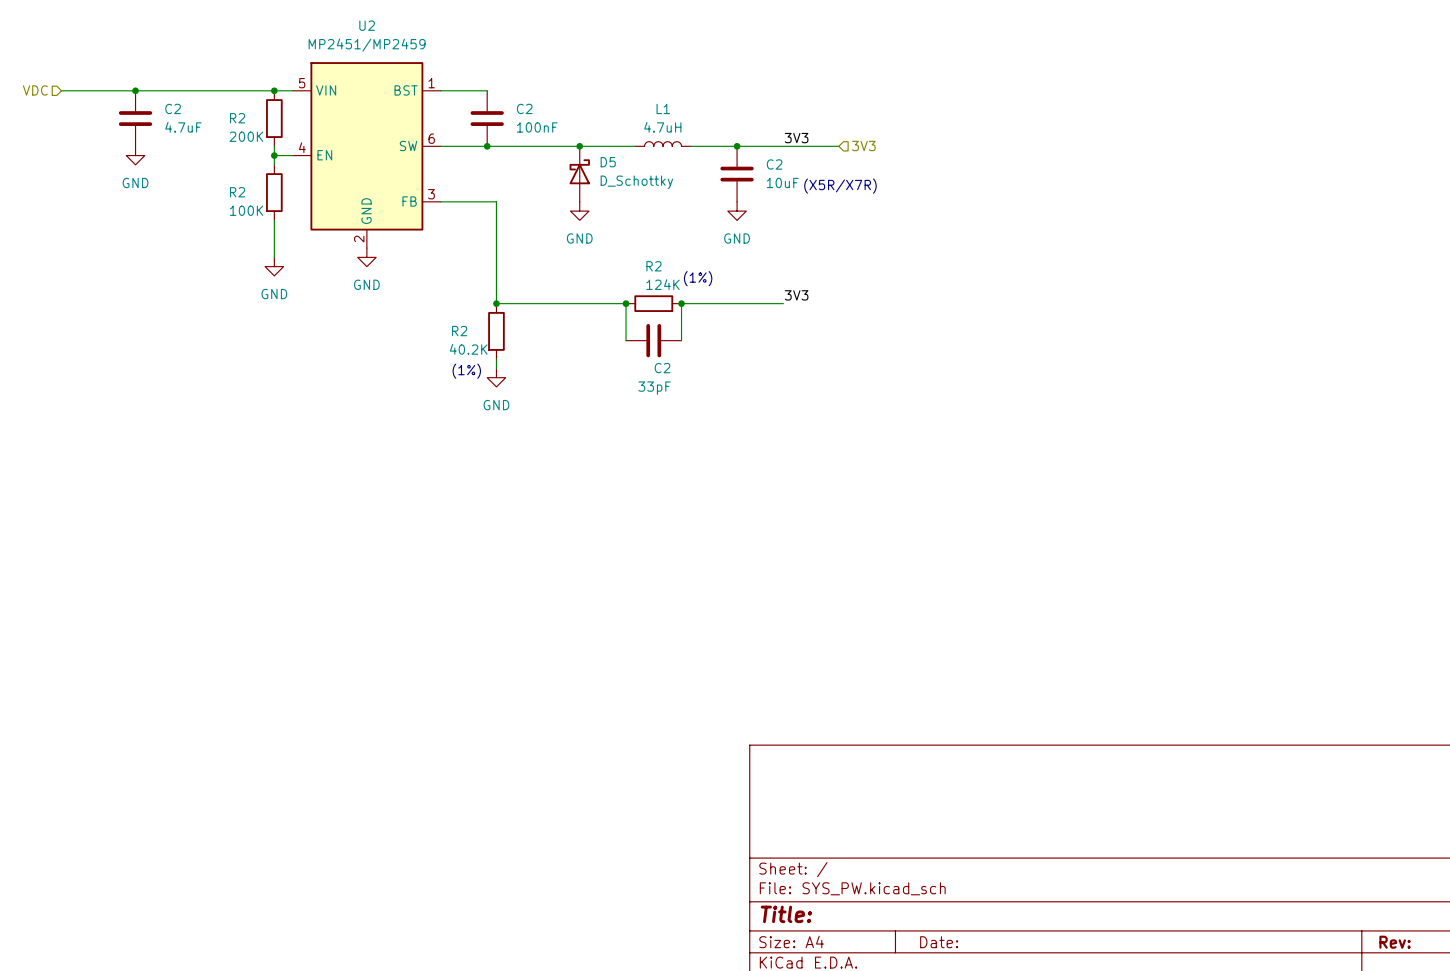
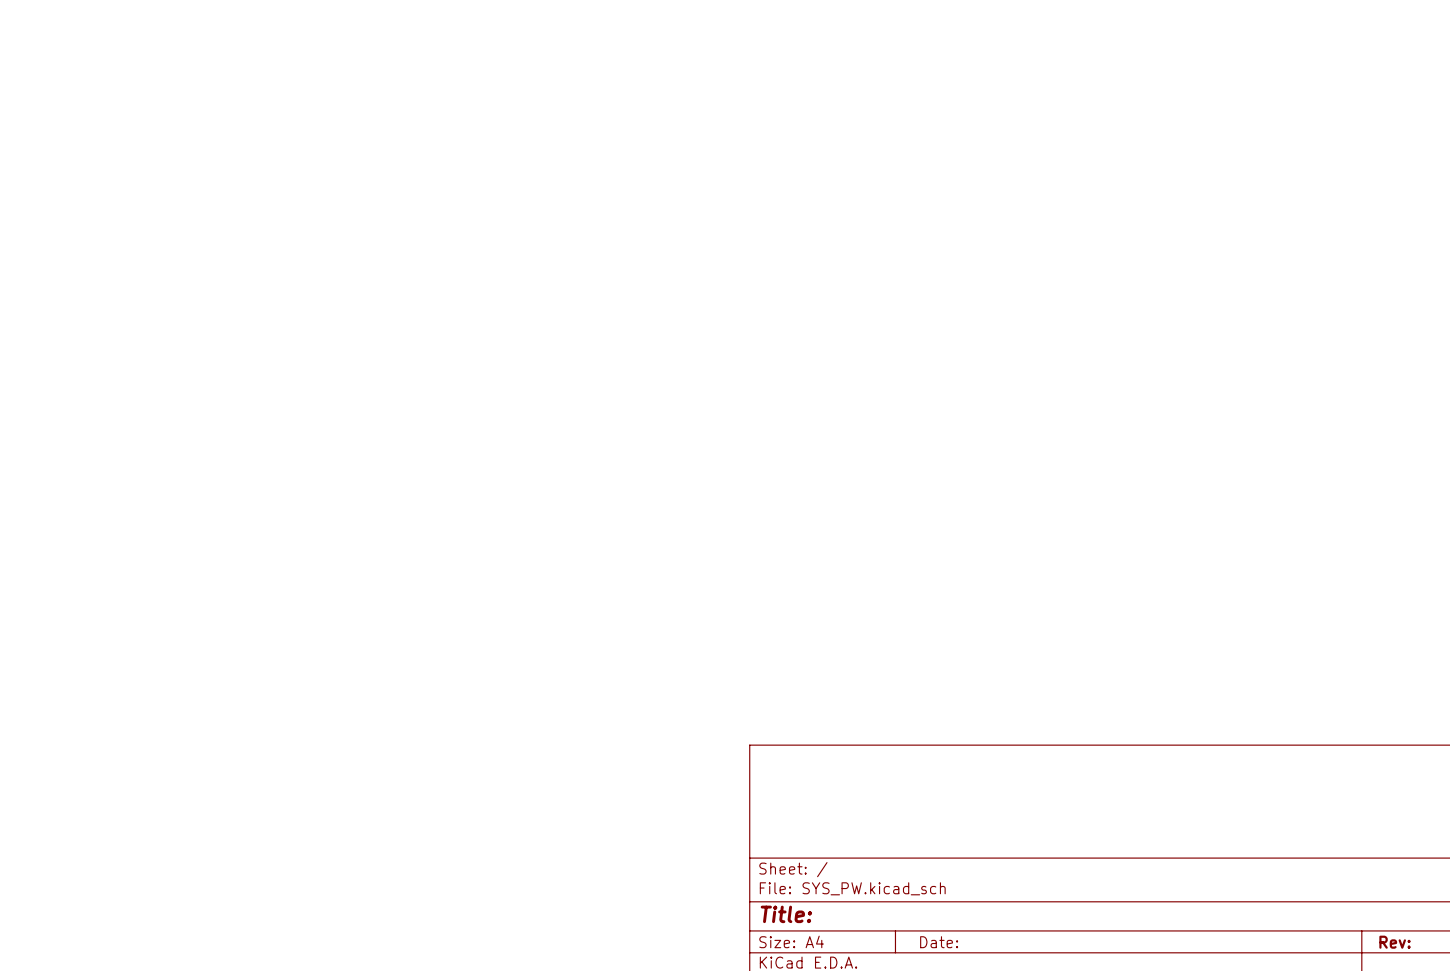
hierarchical label: VDC (35, 90) -> none
wire: (61, 90) (292, 90) -> none
junction: (135, 90) -> none
junction: (274, 90) -> none
wire: (440, 90) (487, 90) -> none
C2: 4.7uF (135, 118) -> none
R2: 200K (274, 118) -> none
C2: 100nF (487, 118) -> none
label: 3V3 (796, 138) -> none
L1: 4.7uH (663, 144) -> none
hierarchical label: 3V3 (863, 145) -> none
wire: (274, 146) (274, 164) -> none
wire: (440, 146) (635, 146) -> none
junction: (487, 146) -> none
junction: (579, 146) -> none
wire: (690, 146) (838, 146) -> none
junction: (737, 146) -> none
power symbol: GND (135, 155) -> none
wire: (274, 155) (292, 155) -> none
junction: (274, 155) -> none
U2: MP2451/MP2459 (366, 155) -> none
D5: D_Schottky (579, 174) -> none
C2: 10uF (737, 174) -> none
text: (X5R/X7R) (840, 186) -> none
R2: 100K (274, 192) -> none
wire: (440, 201) (496, 201) (496, 303) (626, 303) (626, 340) -> none
power symbol: GND (579, 211) -> none
power symbol: GND (737, 211) -> none
wire: (274, 220) (274, 257) -> none
power symbol: GND (366, 257) -> none
power symbol: GND (274, 266) -> none
text: (1%) (698, 278) -> none
label: 3V3 (796, 295) -> none
junction: (496, 303) -> none
junction: (626, 303) -> none
R2: 124K (653, 303) -> none
junction: (681, 303) -> none
wire: (783, 303) (681, 303) (681, 340) -> none
R2: 40.2K (496, 331) -> none
C2: 33pF (653, 340) -> none
wire: (496, 359) (496, 368) -> none
text: (1%) (466, 371) -> none
power symbol: GND (496, 377) -> none

